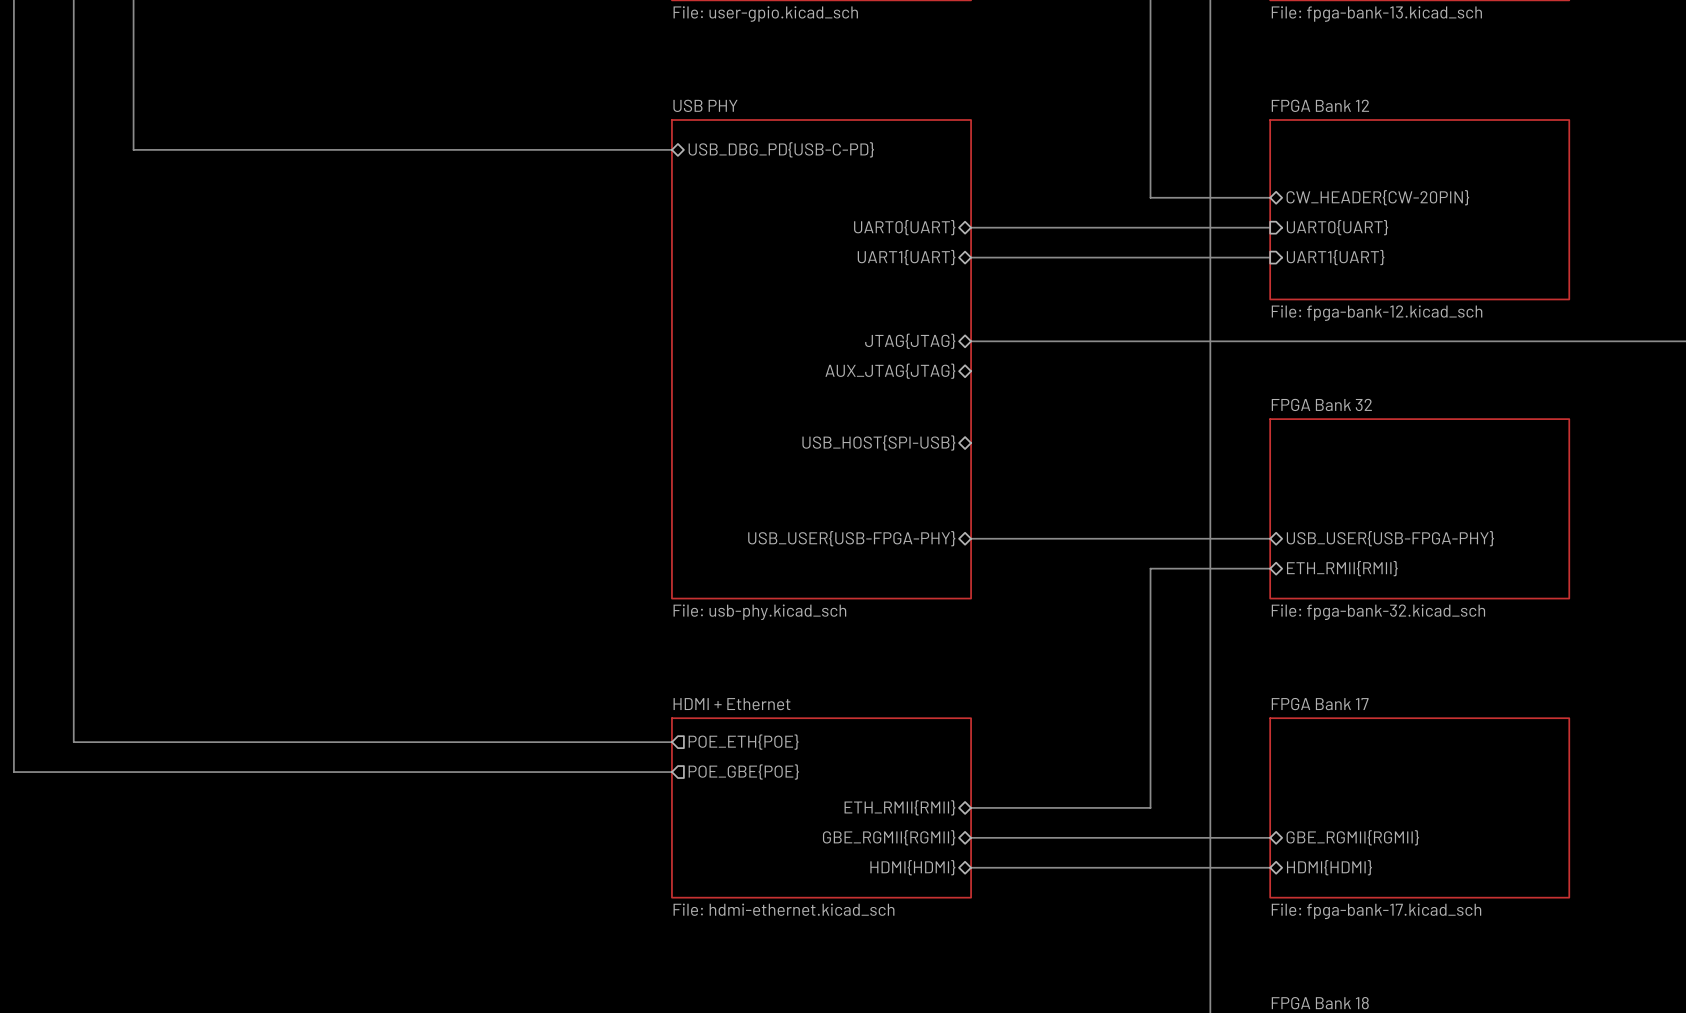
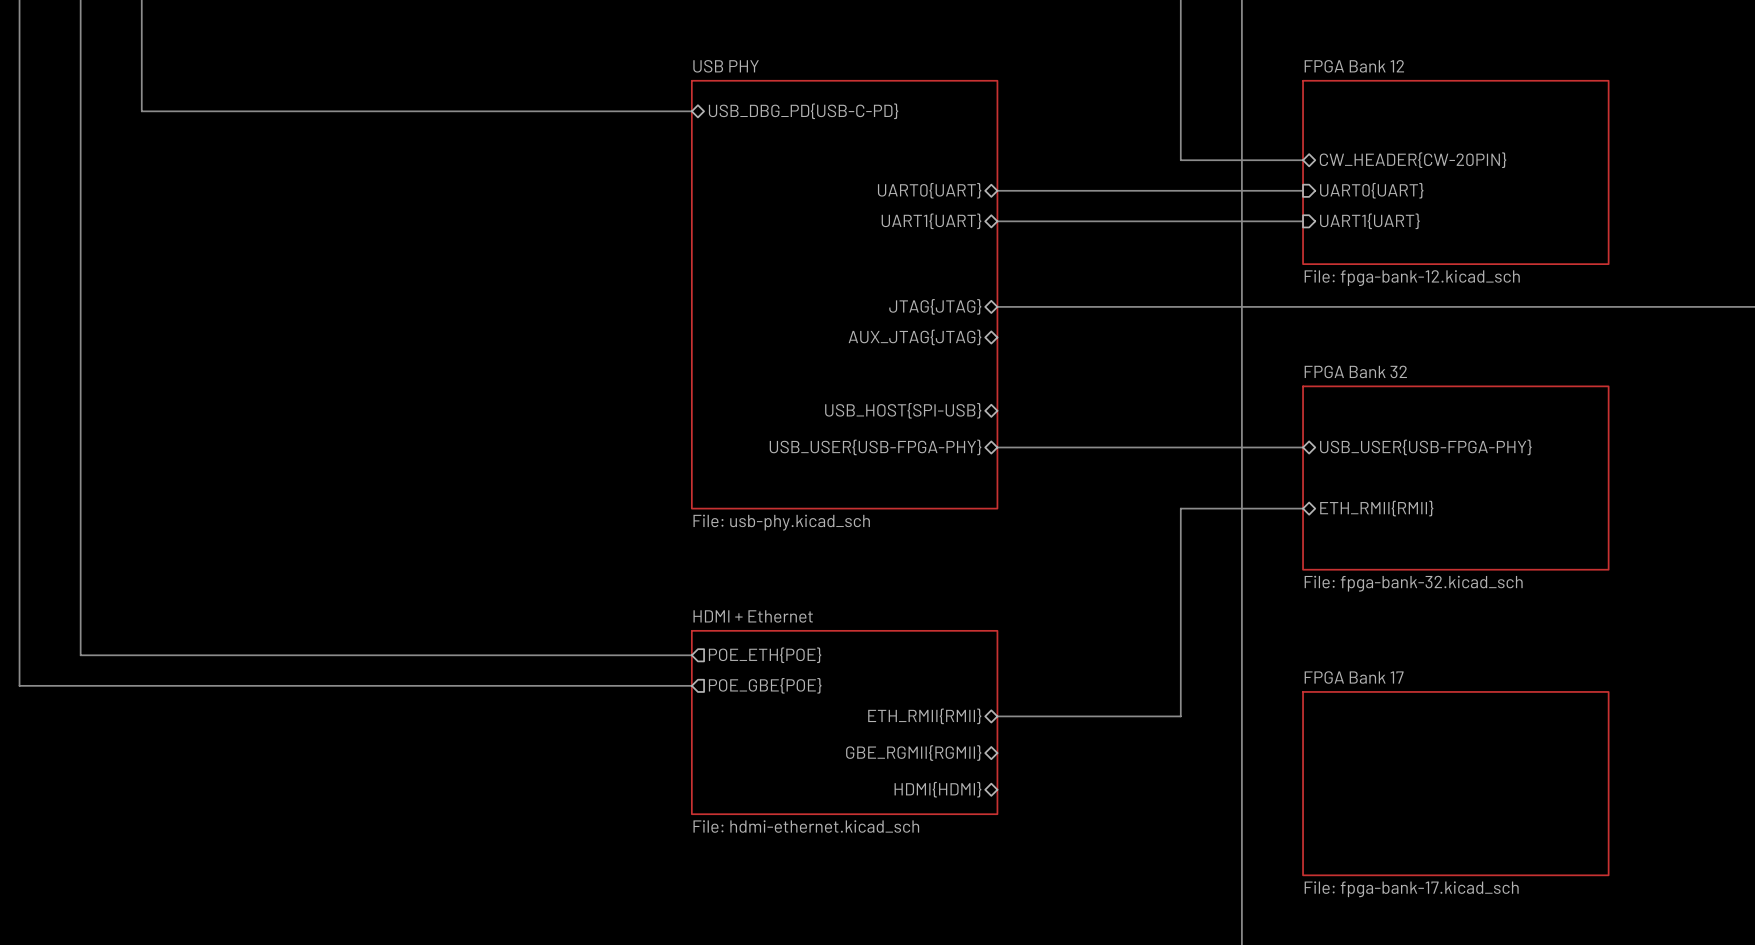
sheet USB PHY: none -> File: usb-phy.kicad_sch (844, 294)
sheet USB PHY: File: usb-phy.kicad_sch (821, 359) -> none
bus: none -> (997, 447) (1303, 447)
sheet pin: none -> USB_USER{USB-FPGA-PHY} (1425, 447)
sheet pin position: USB_USER{USB-FPGA-PHY} (851, 538) -> USB_USER{USB-FPGA-PHY} (875, 447)
bus: (971, 538) (1150, 538) -> none
sheet pin: USB_USER{USB-FPGA-PHY} (1390, 538) -> ETH_RMII{RMII} (1376, 508)
bus: (1150, 568) (1270, 568) -> (1180, 539) (1180, 508)
sheet pin: ETH_RMII{RMII} (1342, 568) -> none
bus: (73, 682) (73, 742) (671, 742) -> (80, 655) (691, 655)
bus: (13, 712) (13, 772) (671, 772) -> (19, 685) (691, 685)
sheet pin position: POE_ETH{POE} (743, 742) -> POE_ETH{POE} (765, 655)
bus: (1150, 742) (1150, 807) (971, 807) -> (1180, 716) (997, 716)
sheet pin position: POE_GBE{POE} (743, 771) -> POE_GBE{POE} (765, 685)
sheet HDMI + Ethernet position: (821, 807) -> (844, 722)
sheet pin position: ETH_RMII{RMII} (899, 807) -> ETH_RMII{RMII} (924, 716)
sheet pin position: GBE_RGMII{RGMII} (889, 837) -> GBE_RGMII{RGMII} (913, 753)
bus: (971, 837) (1270, 837) -> none
sheet pin: GBE_RGMII{RGMII} (1352, 837) -> none
sheet pin position: HDMI{HDMI} (912, 867) -> HDMI{HDMI} (937, 789)
bus: (971, 867) (1270, 867) -> none
sheet pin: HDMI{HDMI} (1329, 867) -> none

